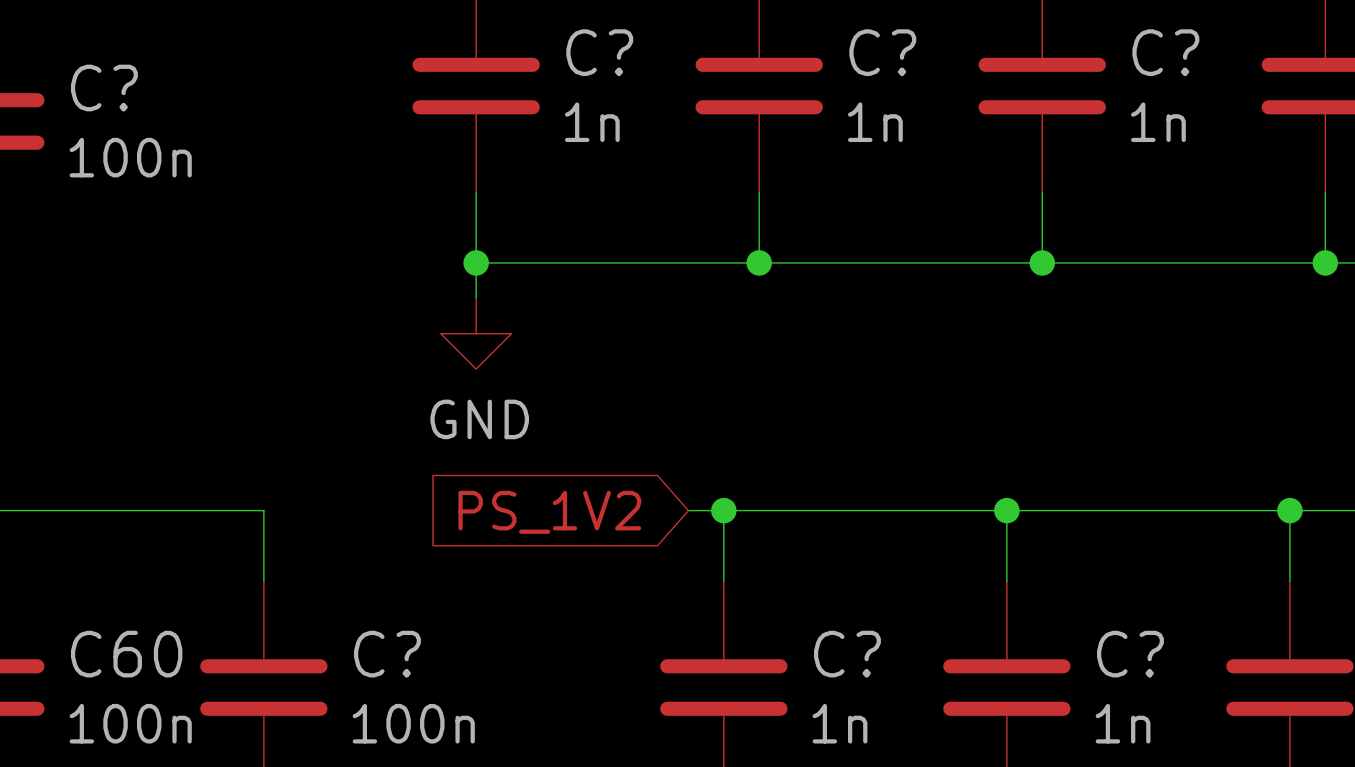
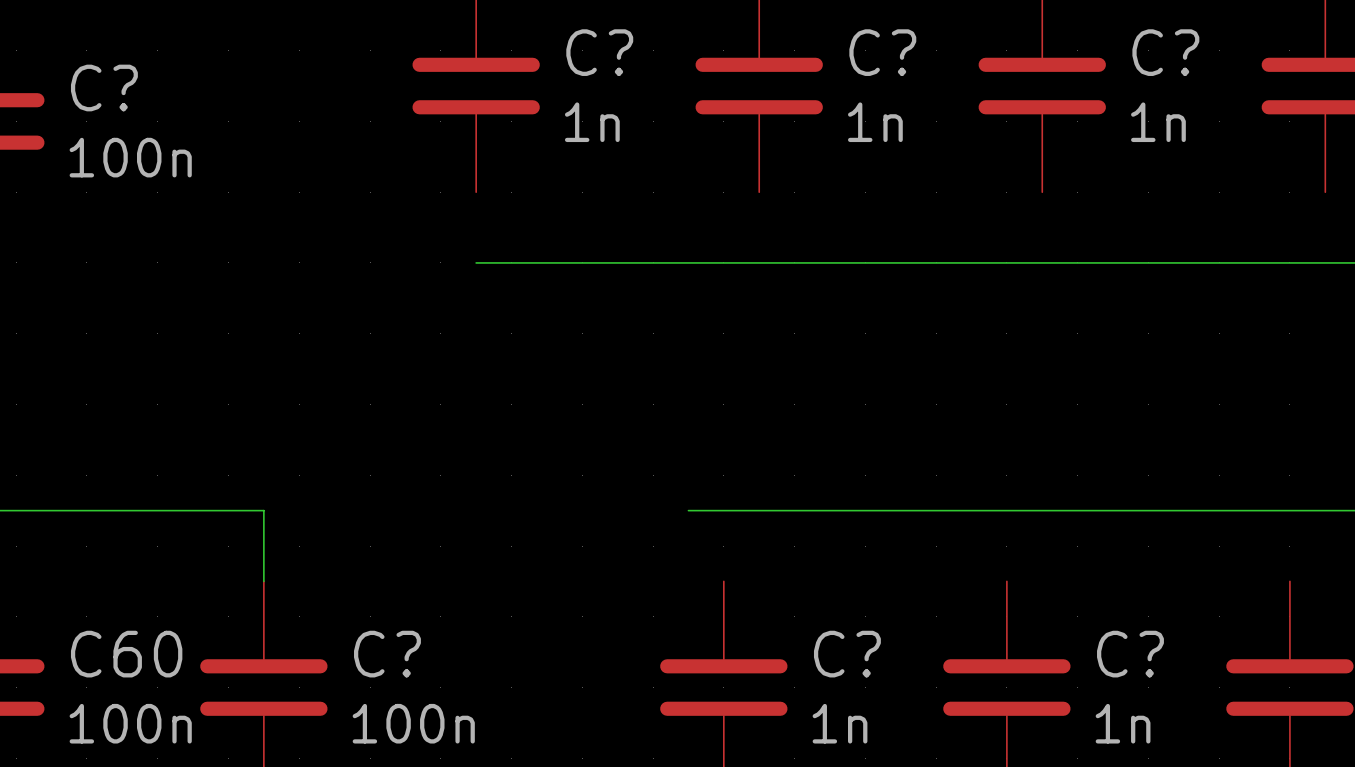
wire: (476, 192) (476, 298) -> none
wire: (759, 192) (759, 262) -> none
wire: (1042, 192) (1042, 262) -> none
wire: (1325, 192) (1325, 262) -> none
junction: (476, 262) -> none
junction: (759, 262) -> none
junction: (1042, 262) -> none
junction: (1325, 262) -> none
power symbol: GND (476, 333) -> none
wire: (723, 510) (723, 581) -> none
junction: (723, 510) -> none
wire: (1006, 510) (1006, 581) -> none
junction: (1006, 510) -> none
wire: (1289, 510) (1289, 581) -> none
junction: (1289, 510) -> none
global label: PS_1V2 (549, 512) -> none

